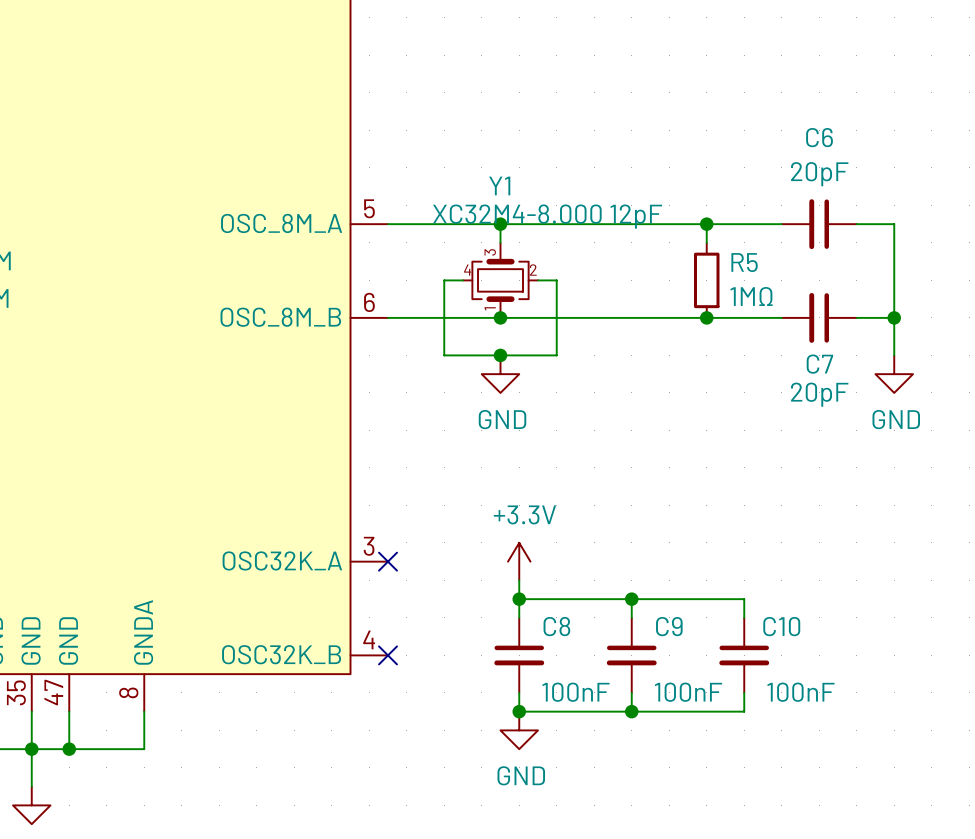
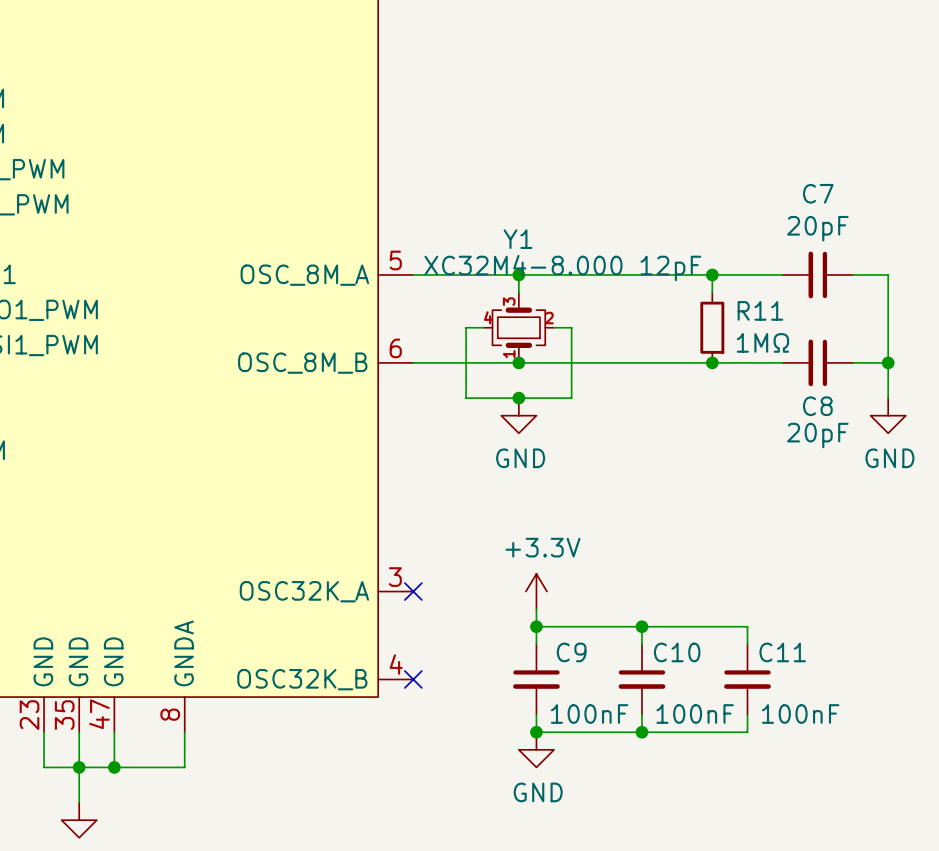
C6 name: C6 (819, 137) -> C7 (818, 193)
R5 name: R5 (744, 262) -> R11 (760, 310)
C7 name: C7 (819, 364) -> C8 (817, 406)
C8 name: C8 (556, 626) -> C9 (571, 652)
C9 name: C9 (669, 626) -> C10 (677, 652)
C10 name: C10 (781, 626) -> C11 (782, 652)

